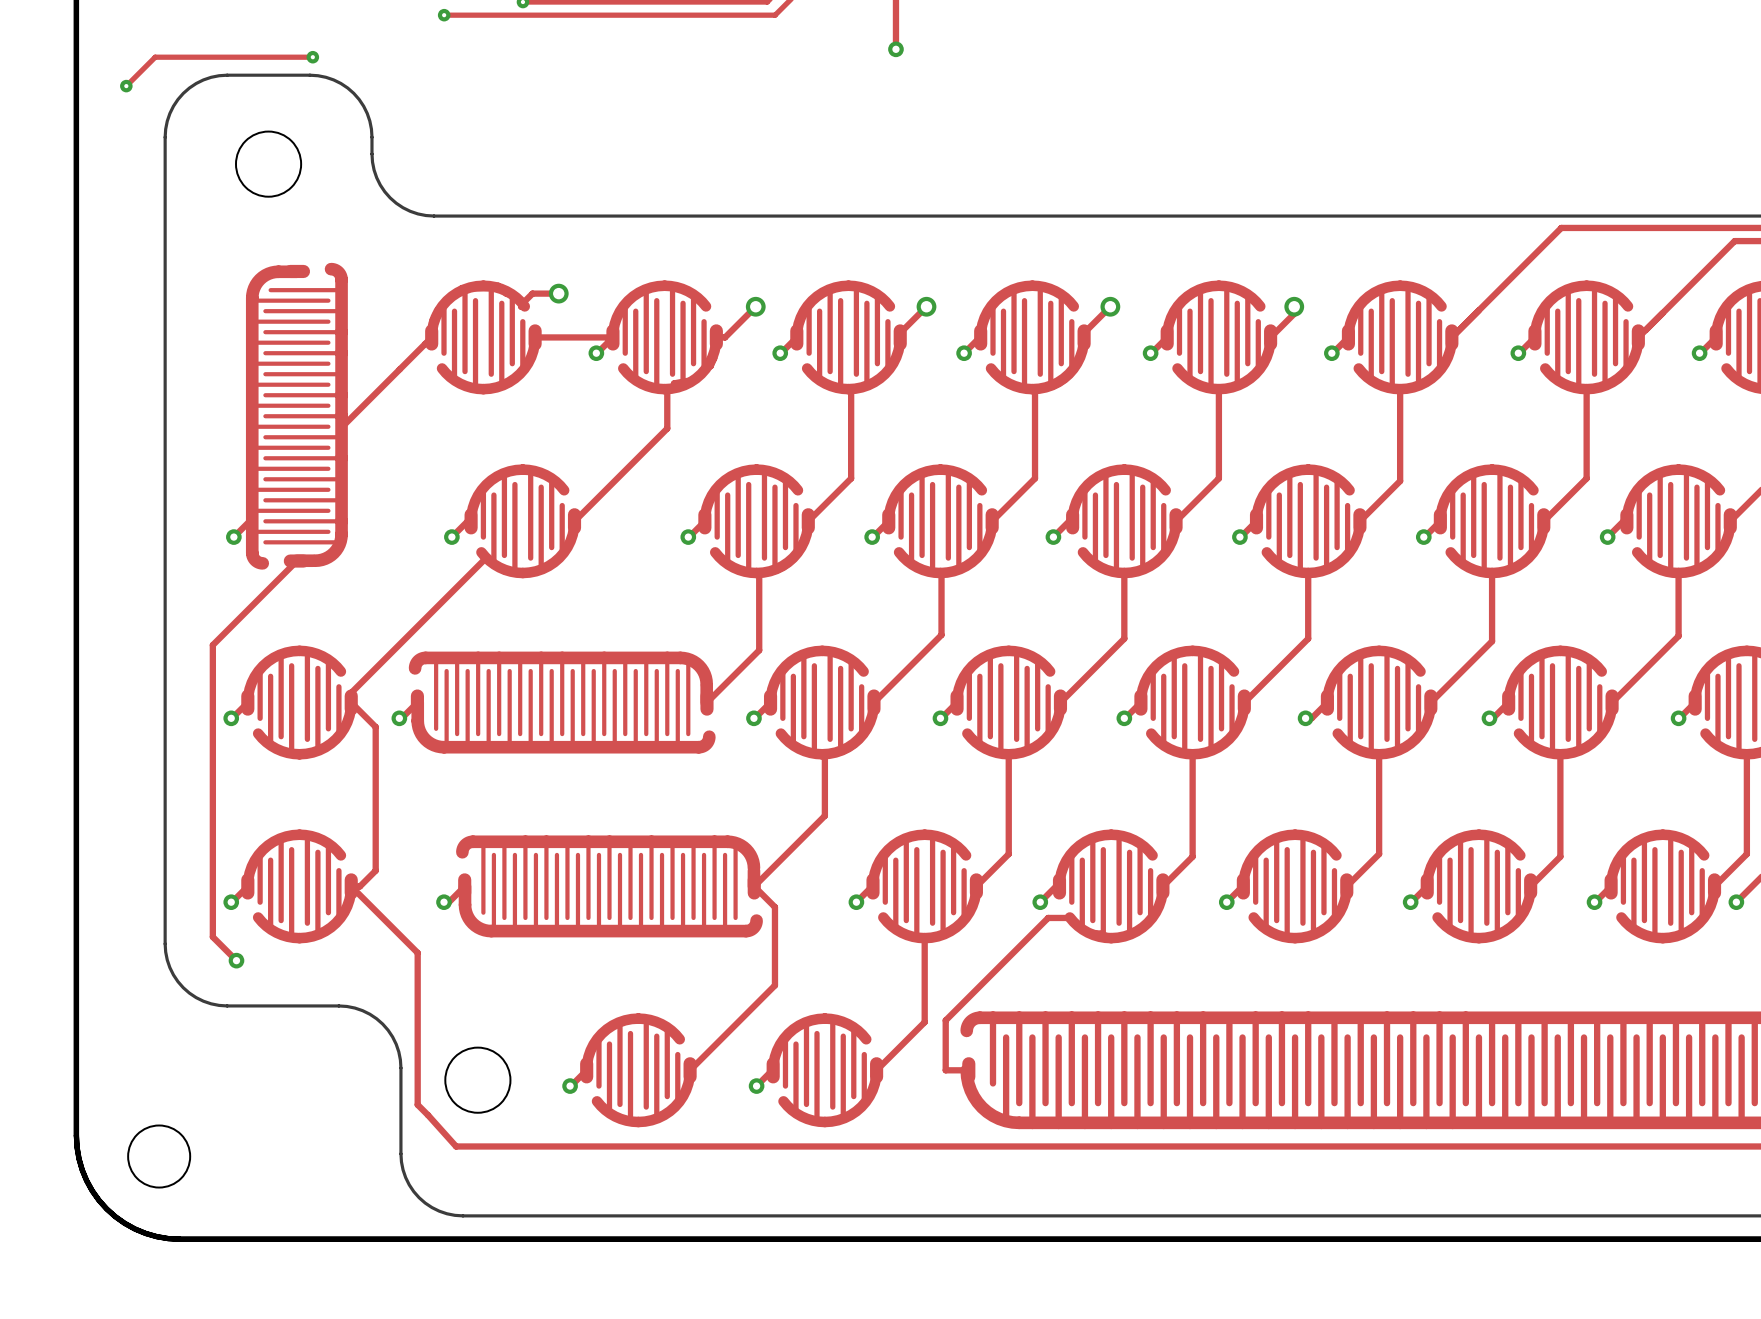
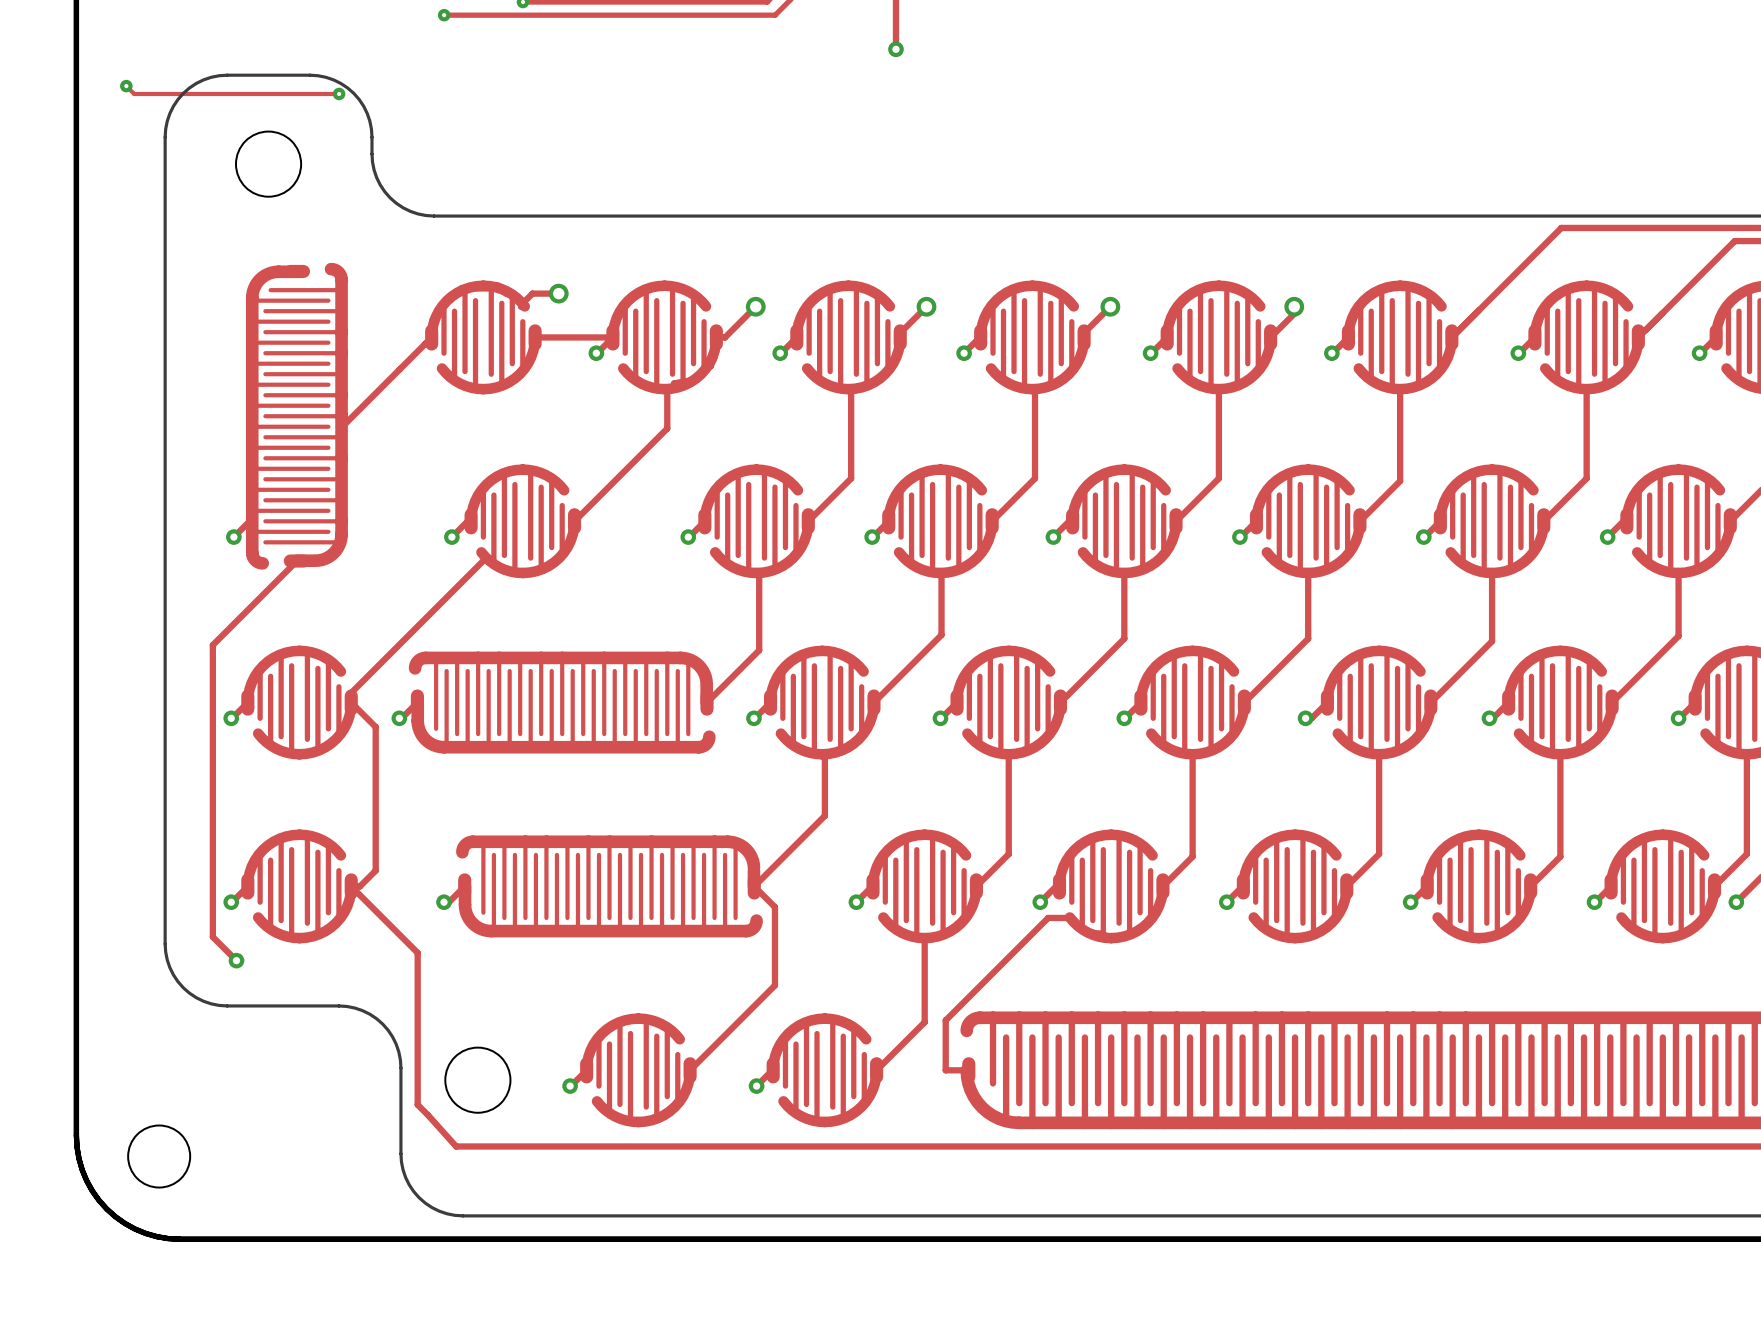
track: (312, 57) (155, 57) (126, 86) -> (339, 93) (134, 93) (126, 86)
via position: (312, 57) -> (339, 93)

